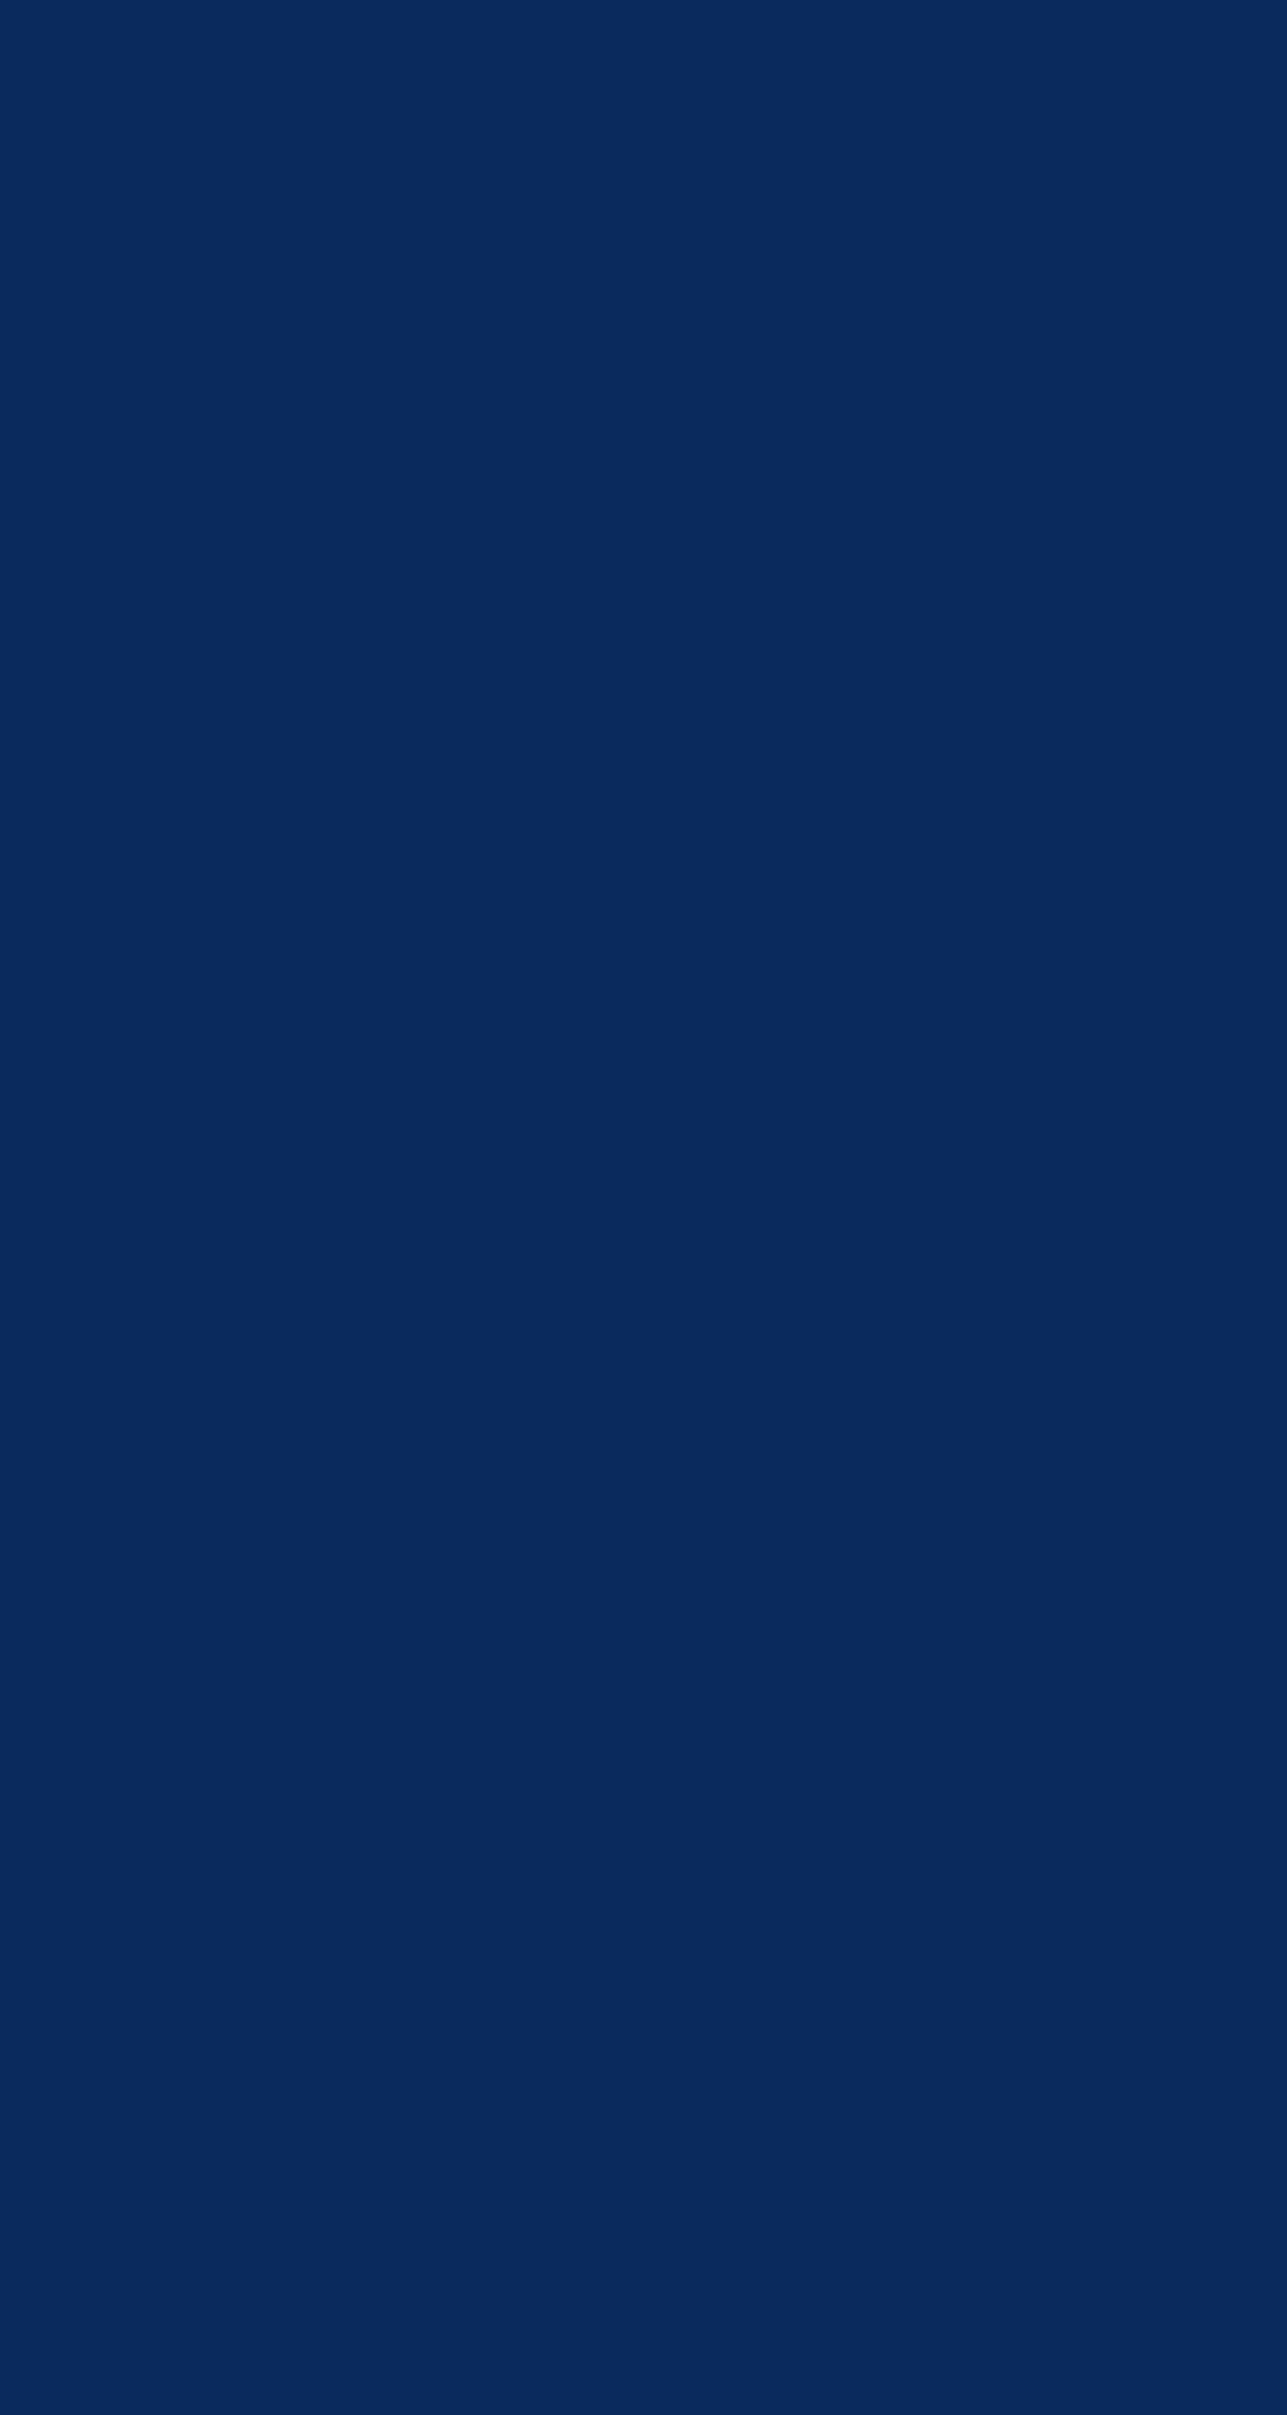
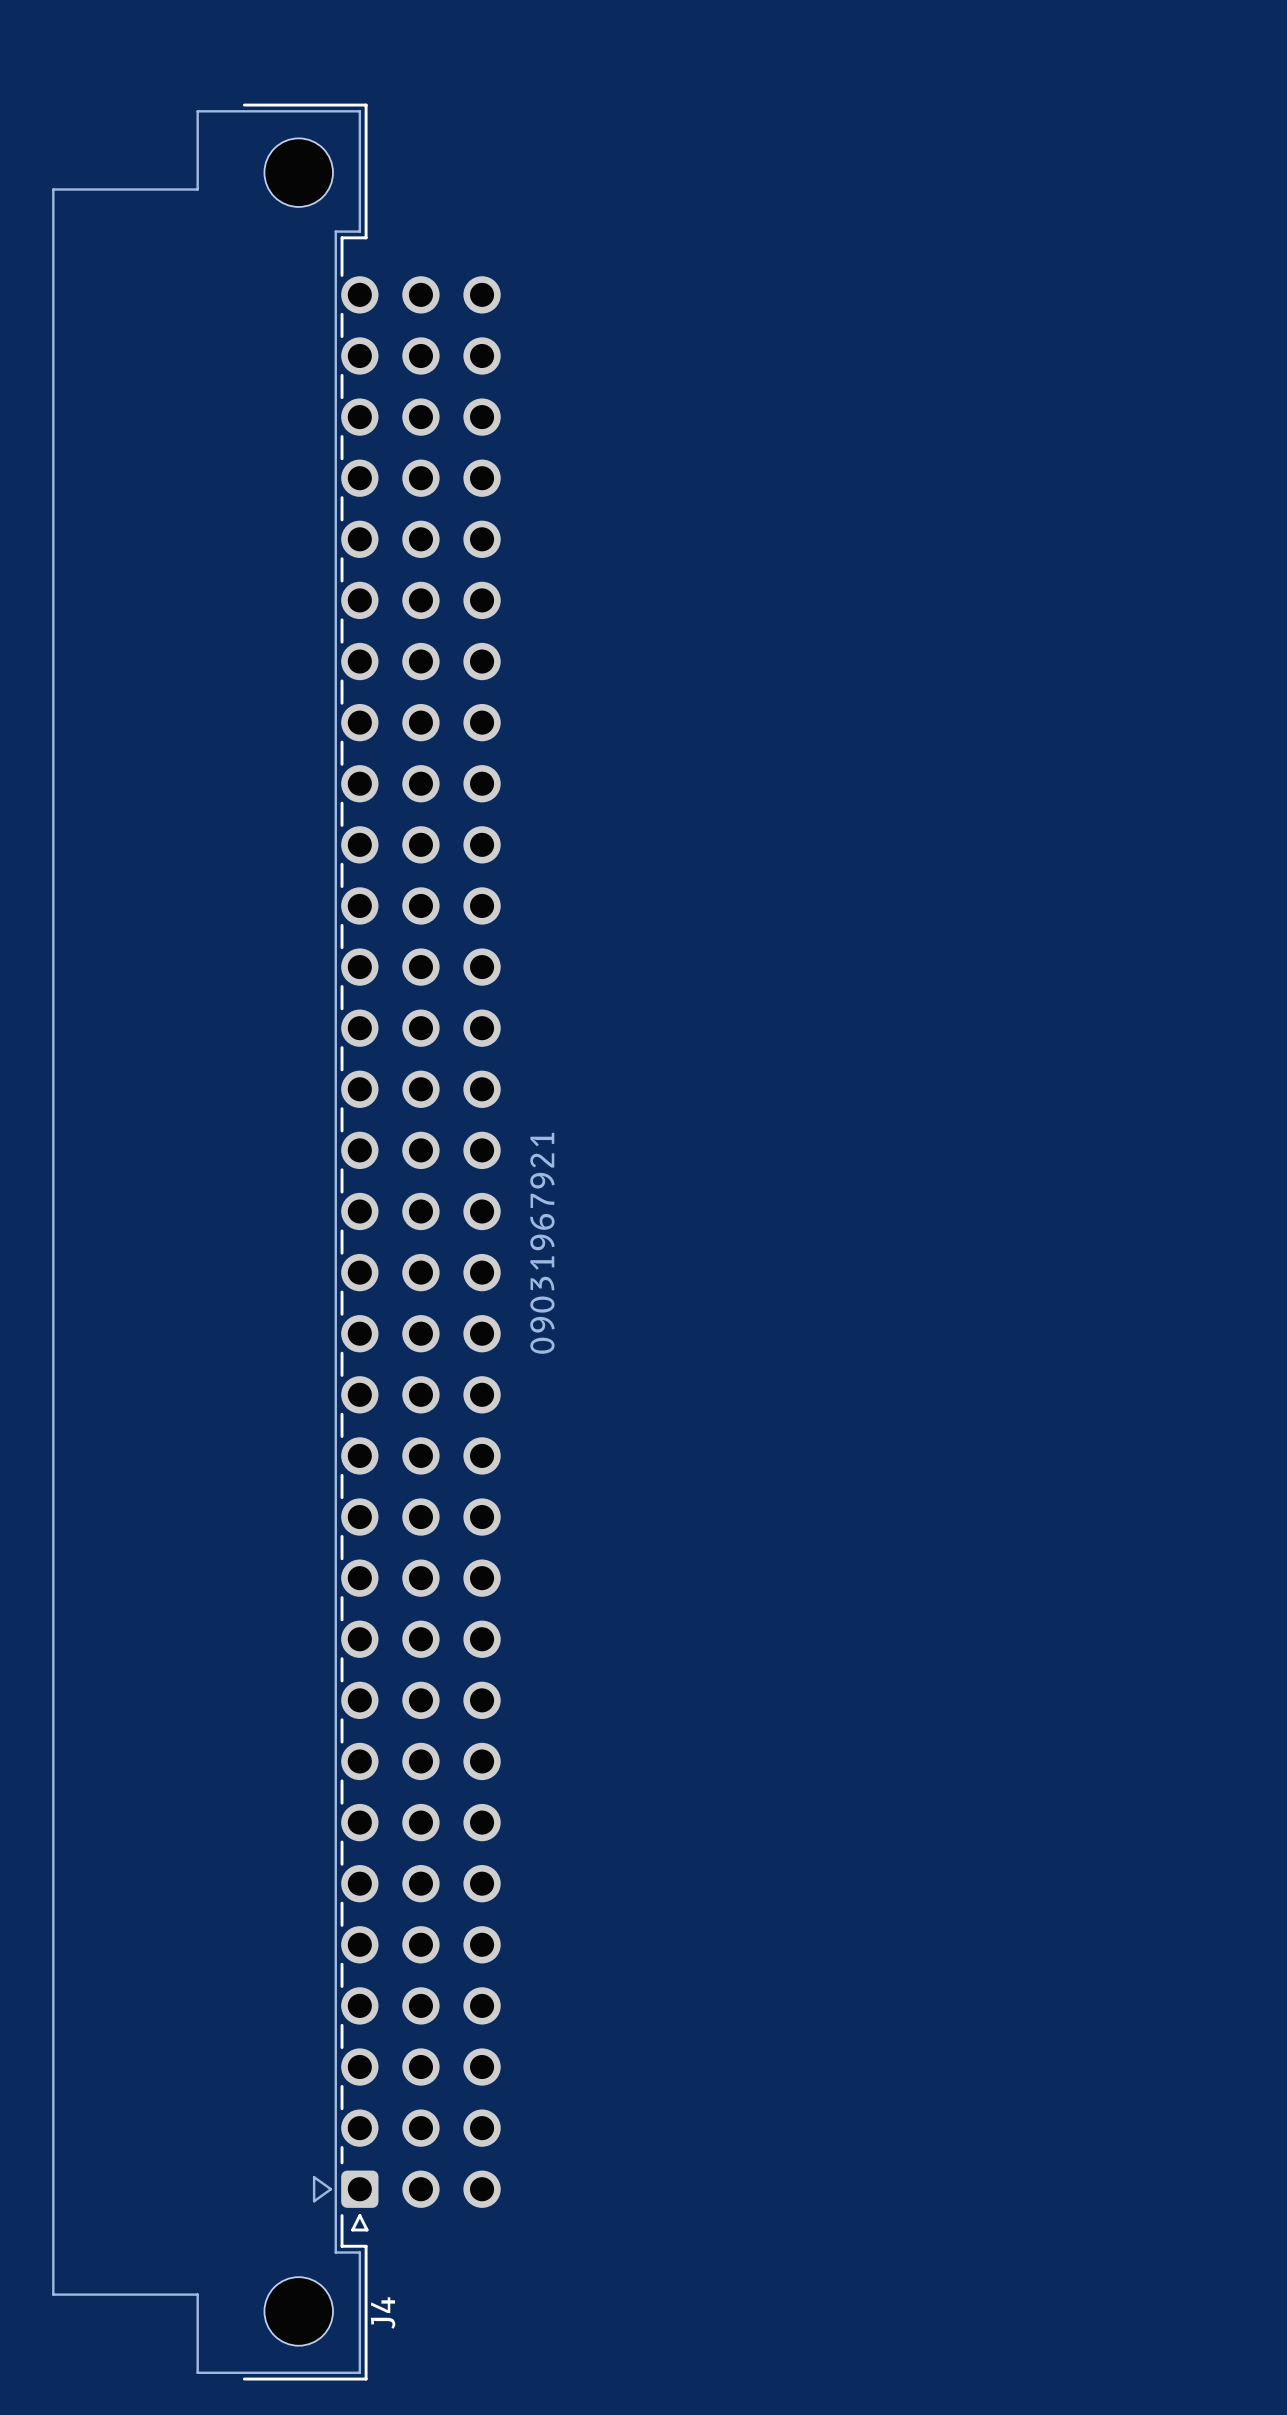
J4: none -> 09031967921 (276, 1242)

